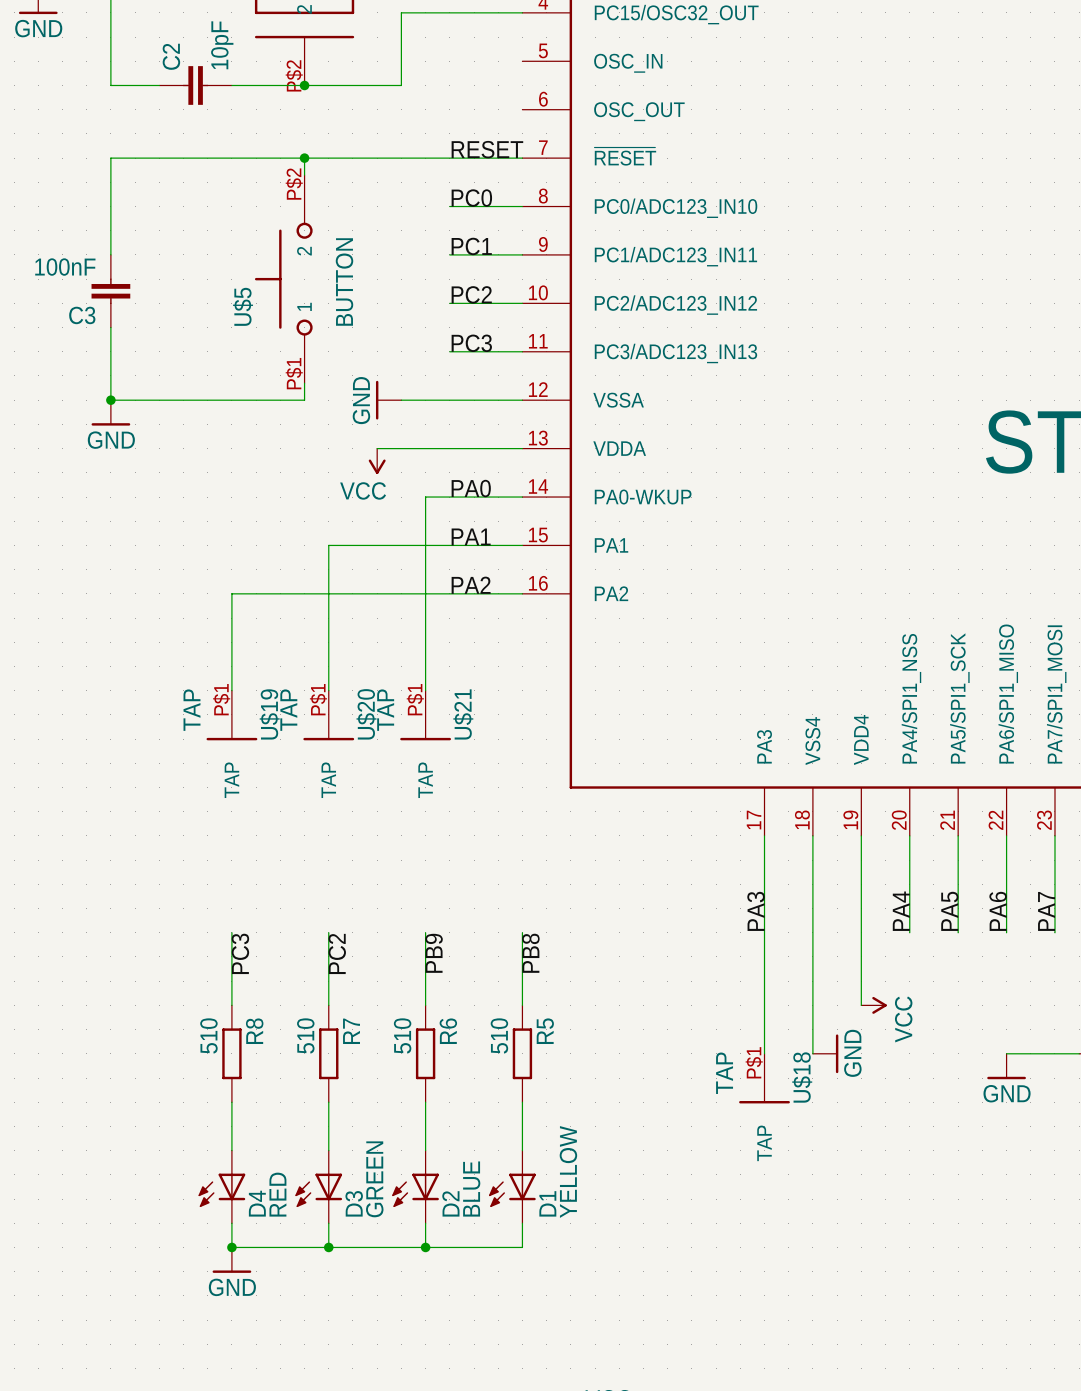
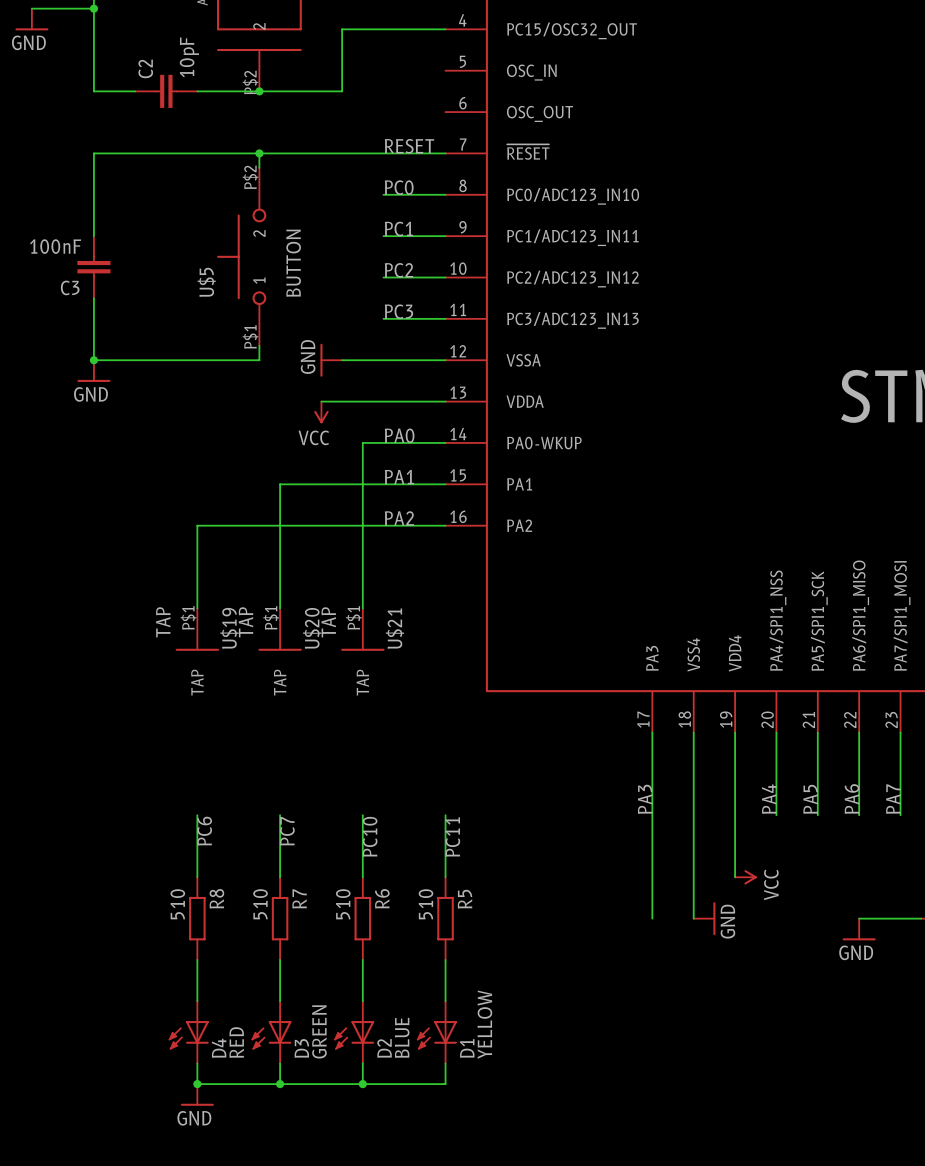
label: PC3 (240, 953) -> PC6 (204, 831)
label: PC2 (337, 953) -> PC7 (287, 831)
label: PB9 (434, 953) -> PC10 (370, 836)
label: PB8 (530, 953) -> PC11 (452, 837)
U$18: TAP (764, 1078) -> none

